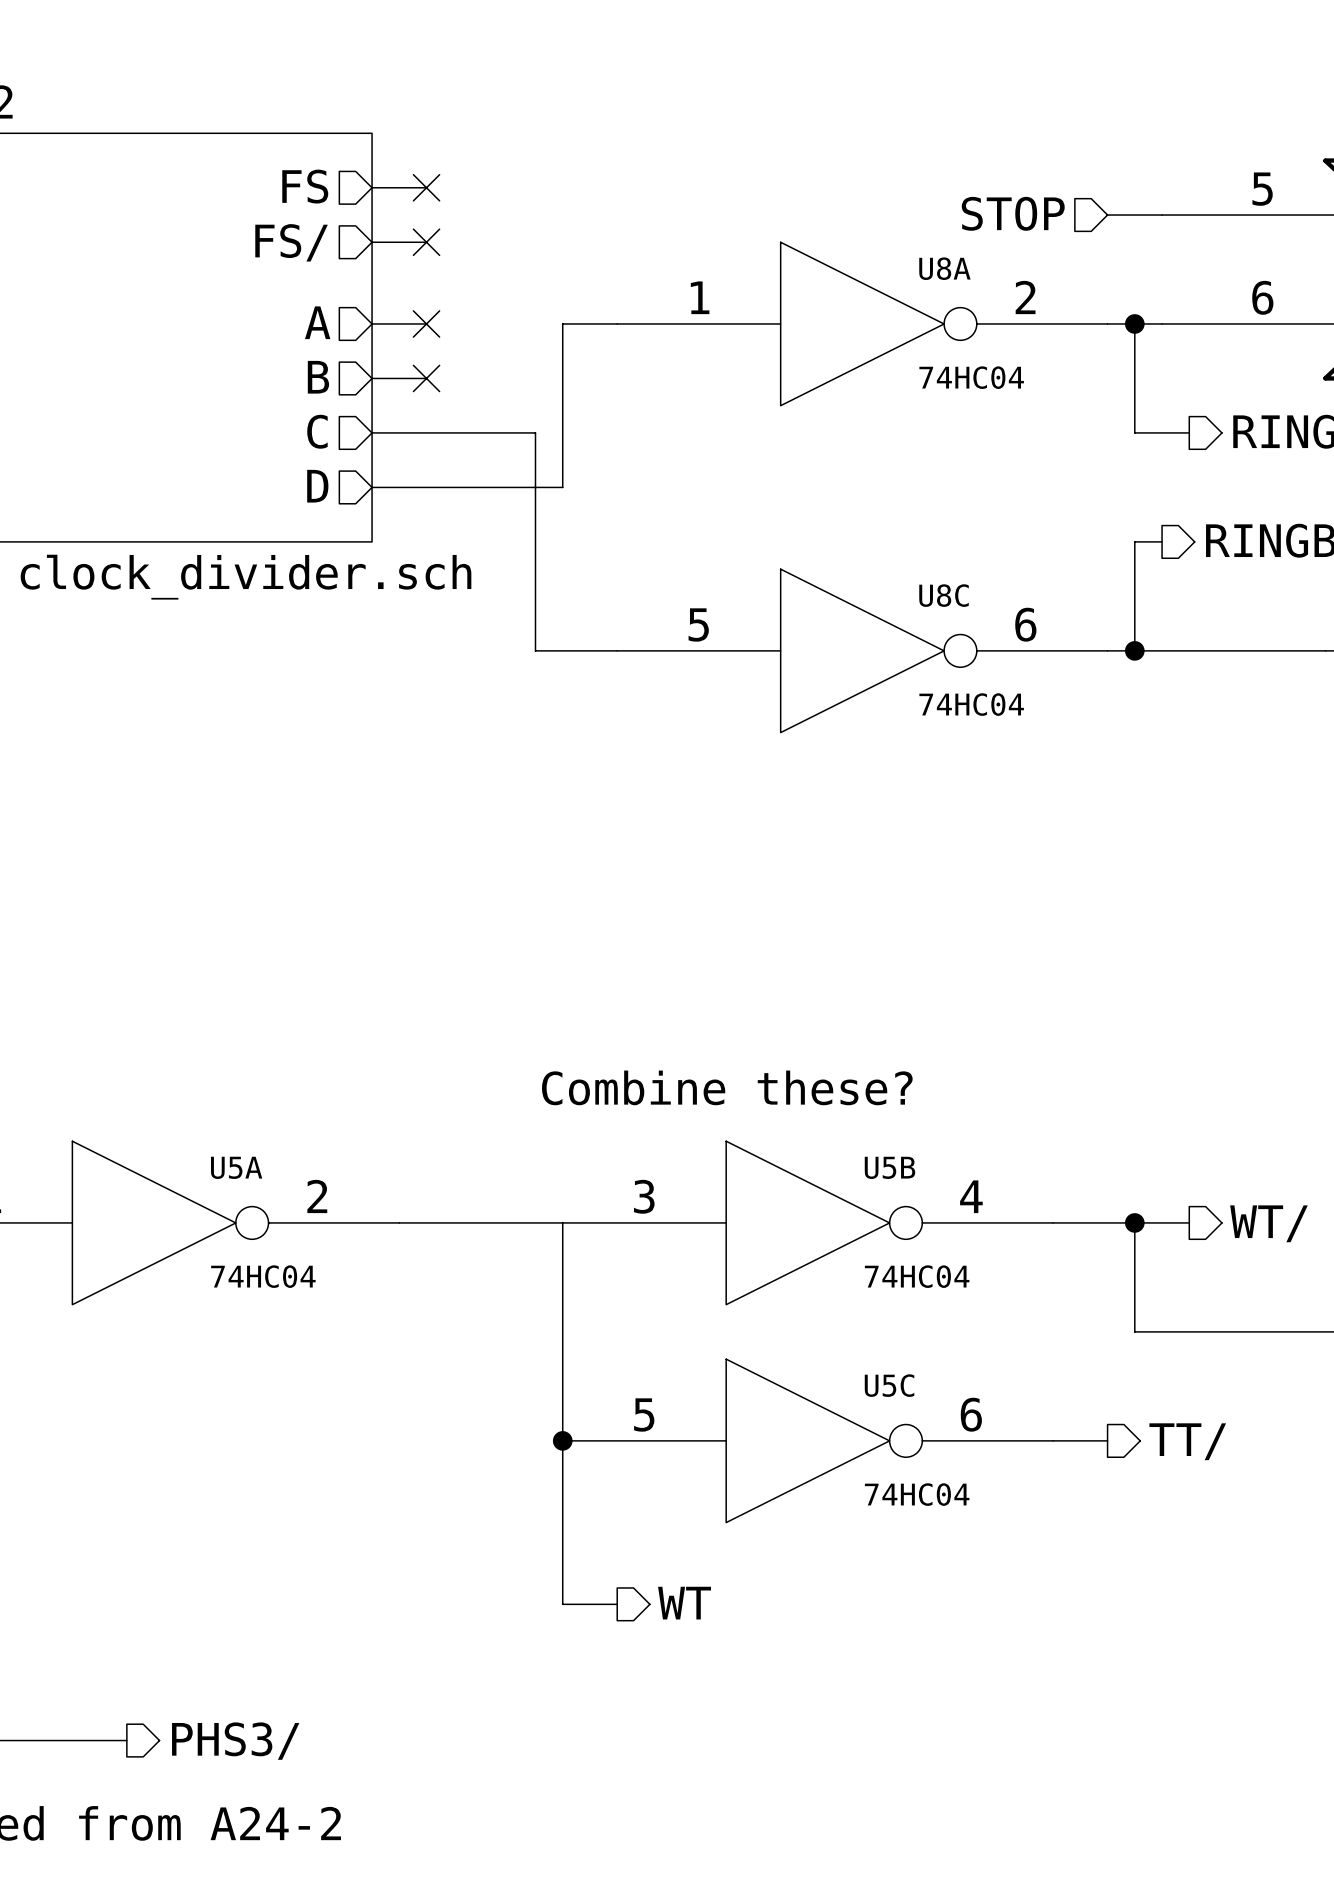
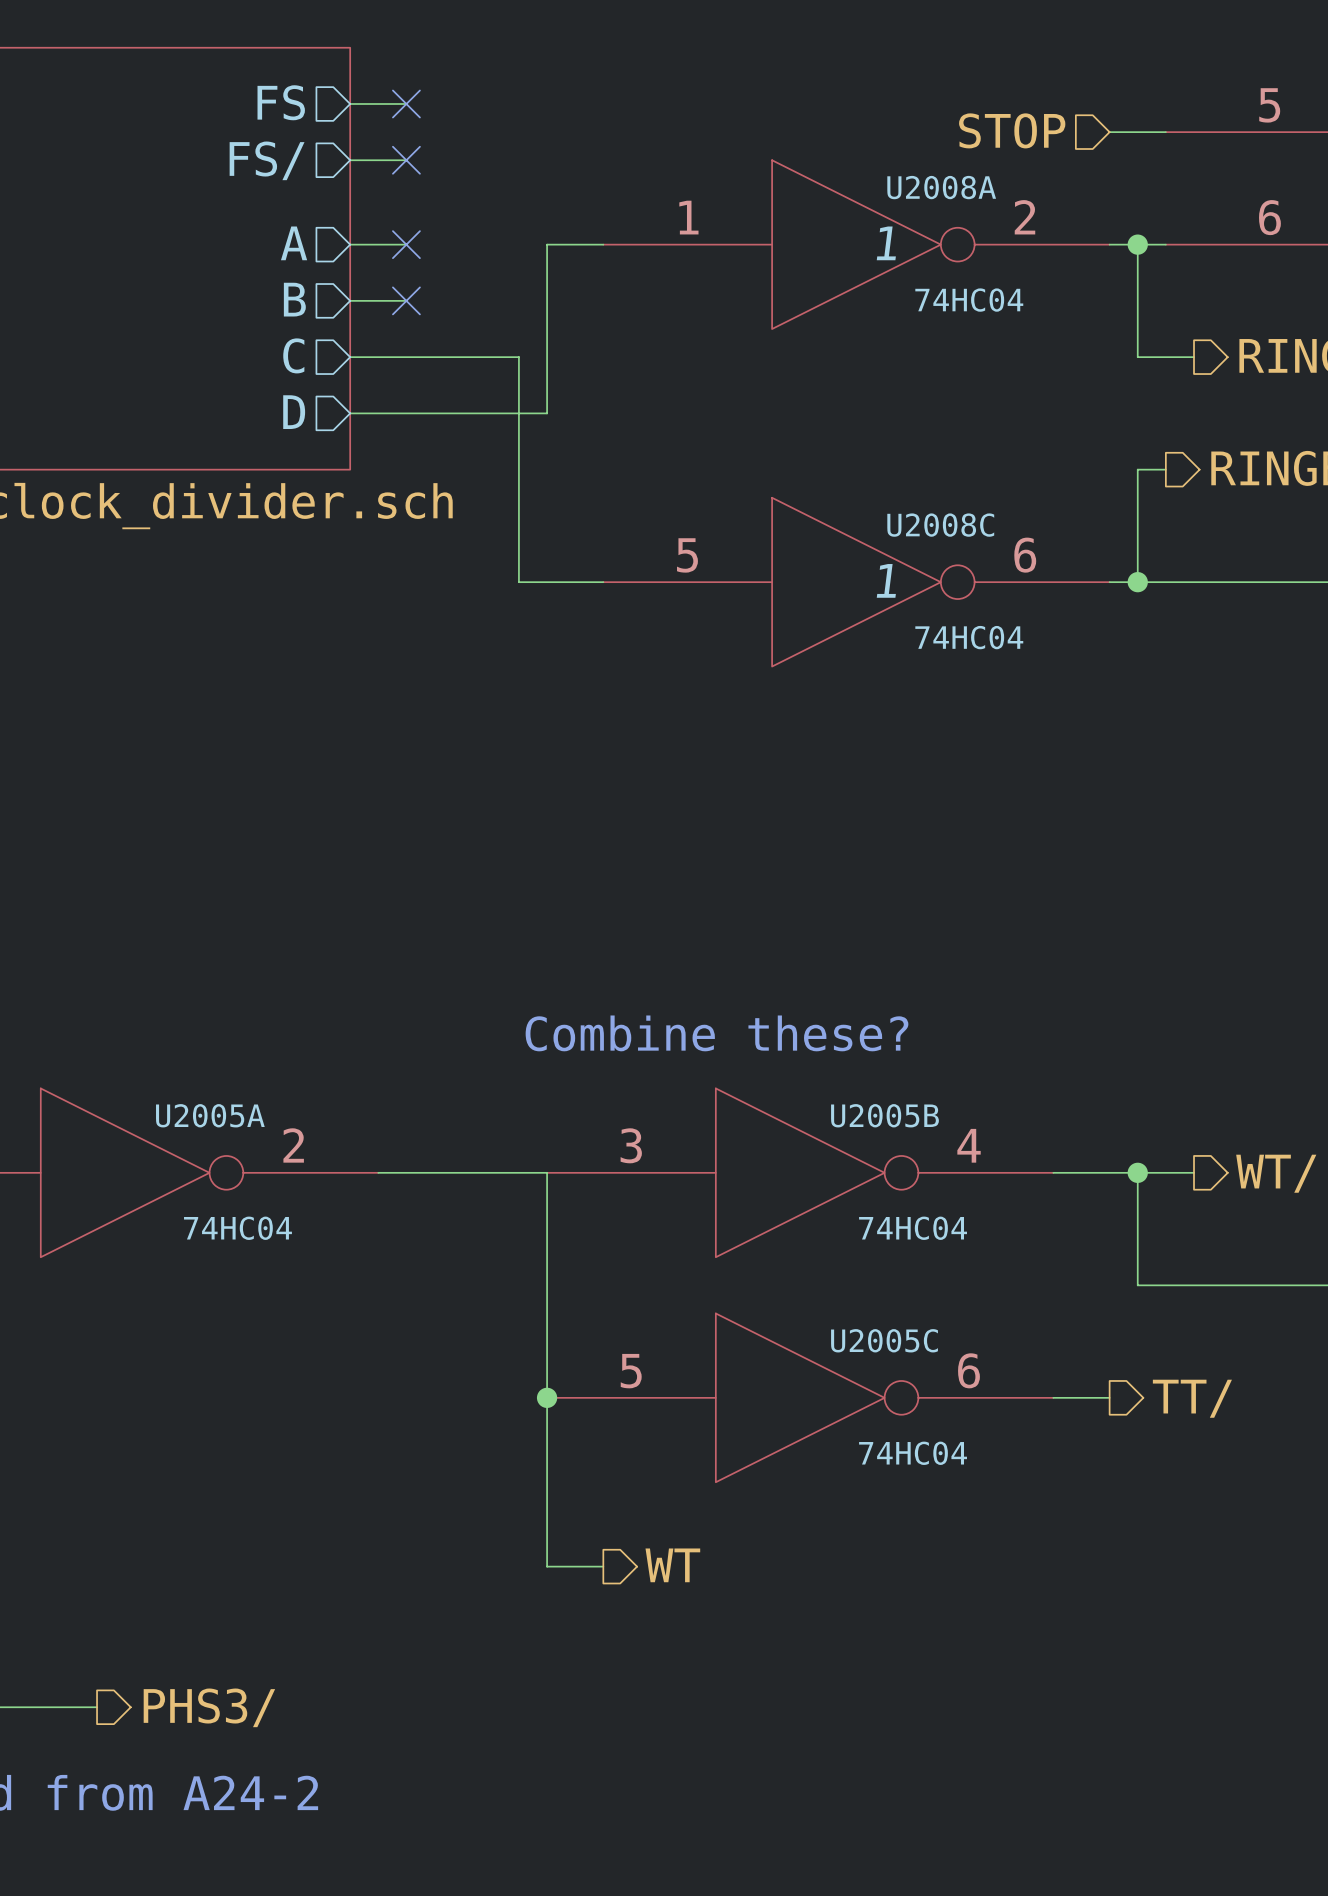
U8A name: U8A (944, 268) -> U2008A (941, 187)
U8A text: none -> 1 (886, 243)
U8C name: U8C (944, 595) -> U2008C (940, 525)
U8C text: none -> 1 (886, 580)
U5A name: U5A (236, 1167) -> U2005A (210, 1115)
U5B name: U5B (890, 1167) -> U2005B (884, 1115)
U5C name: U5C (889, 1385) -> U2005C (884, 1340)

